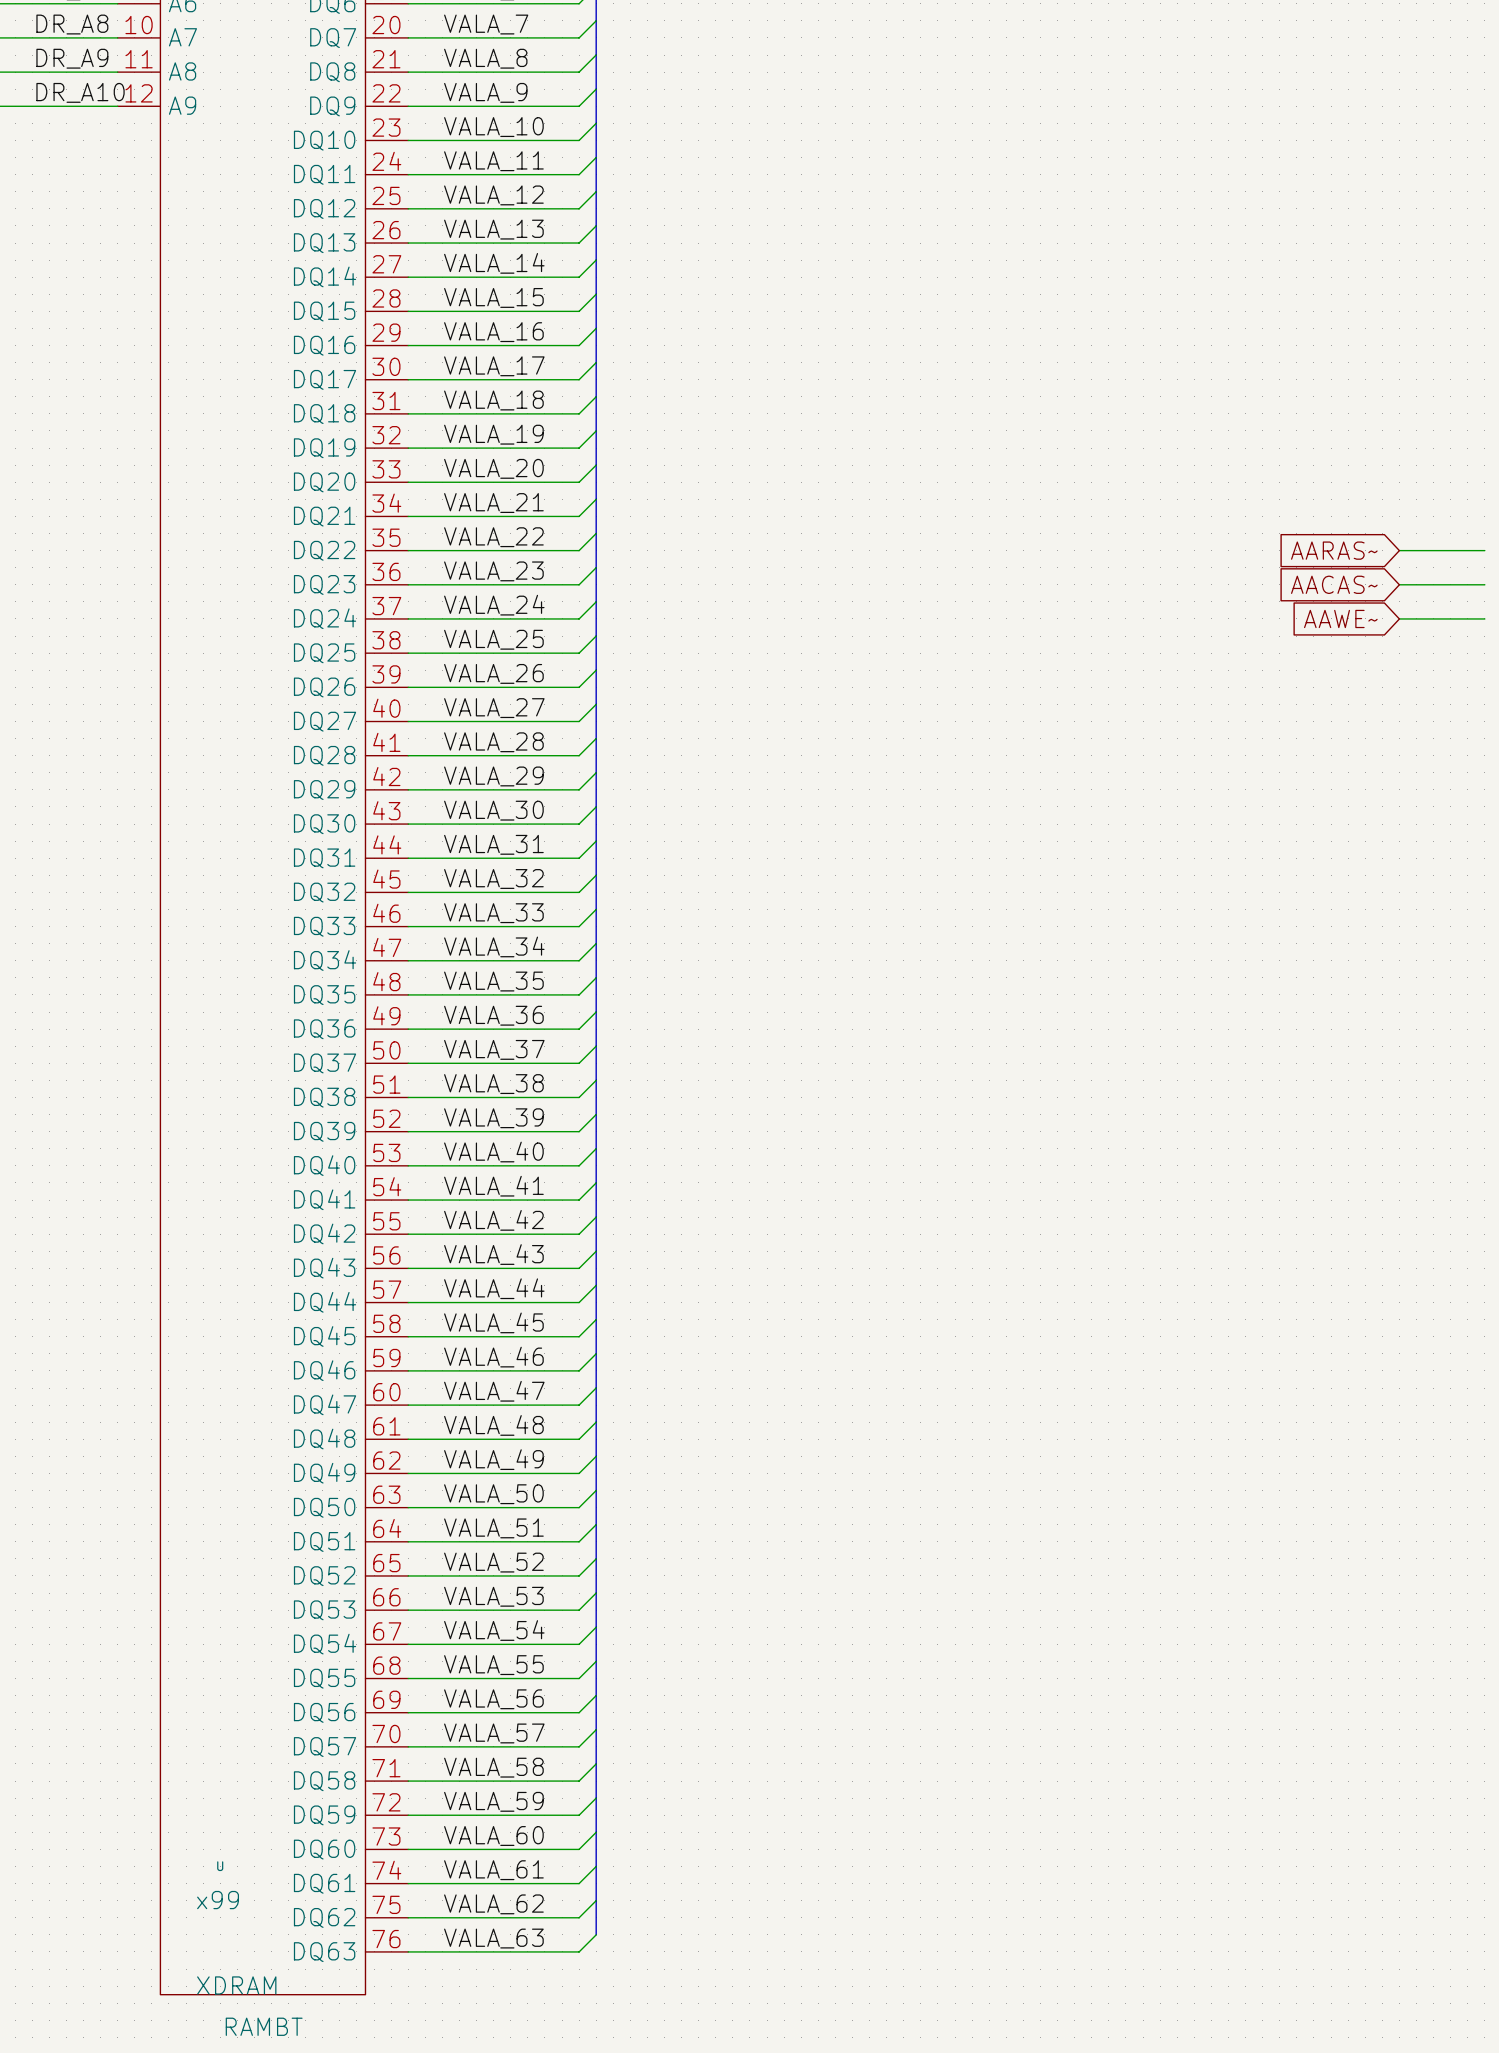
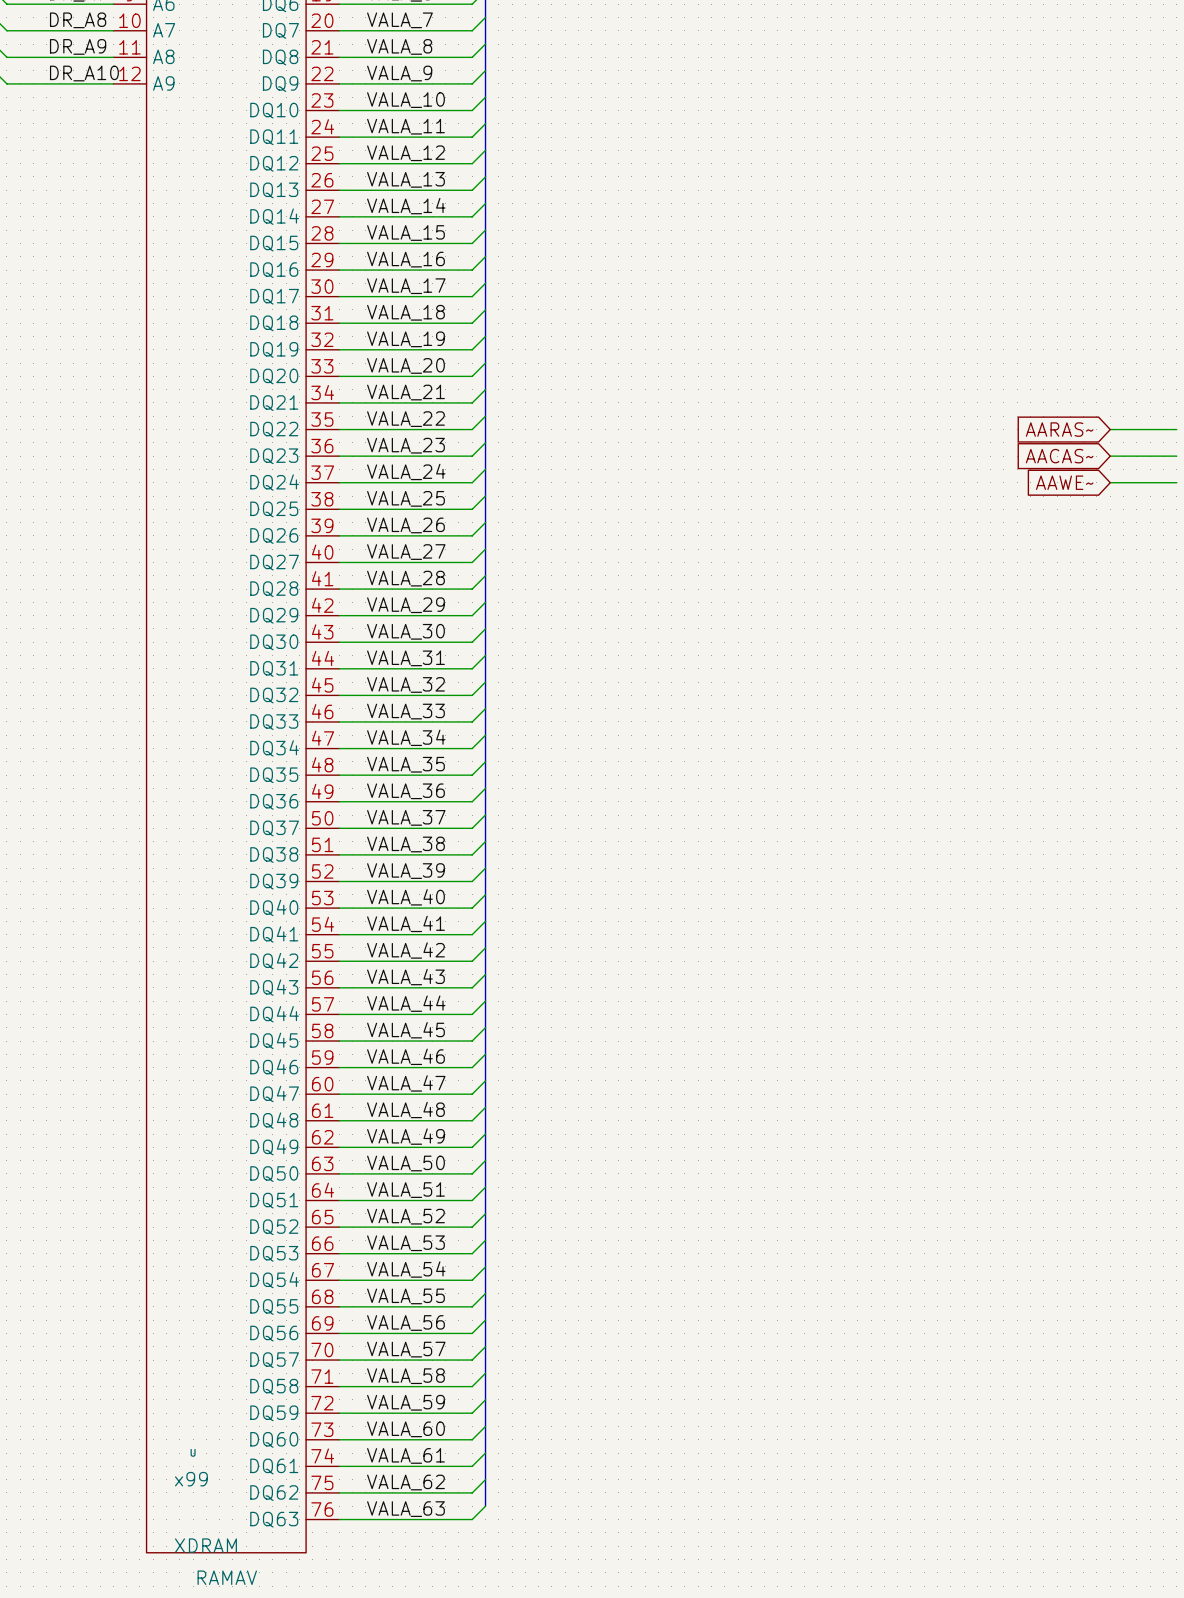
U text: RAMBT (264, 2026) -> RAMAV (227, 1577)

